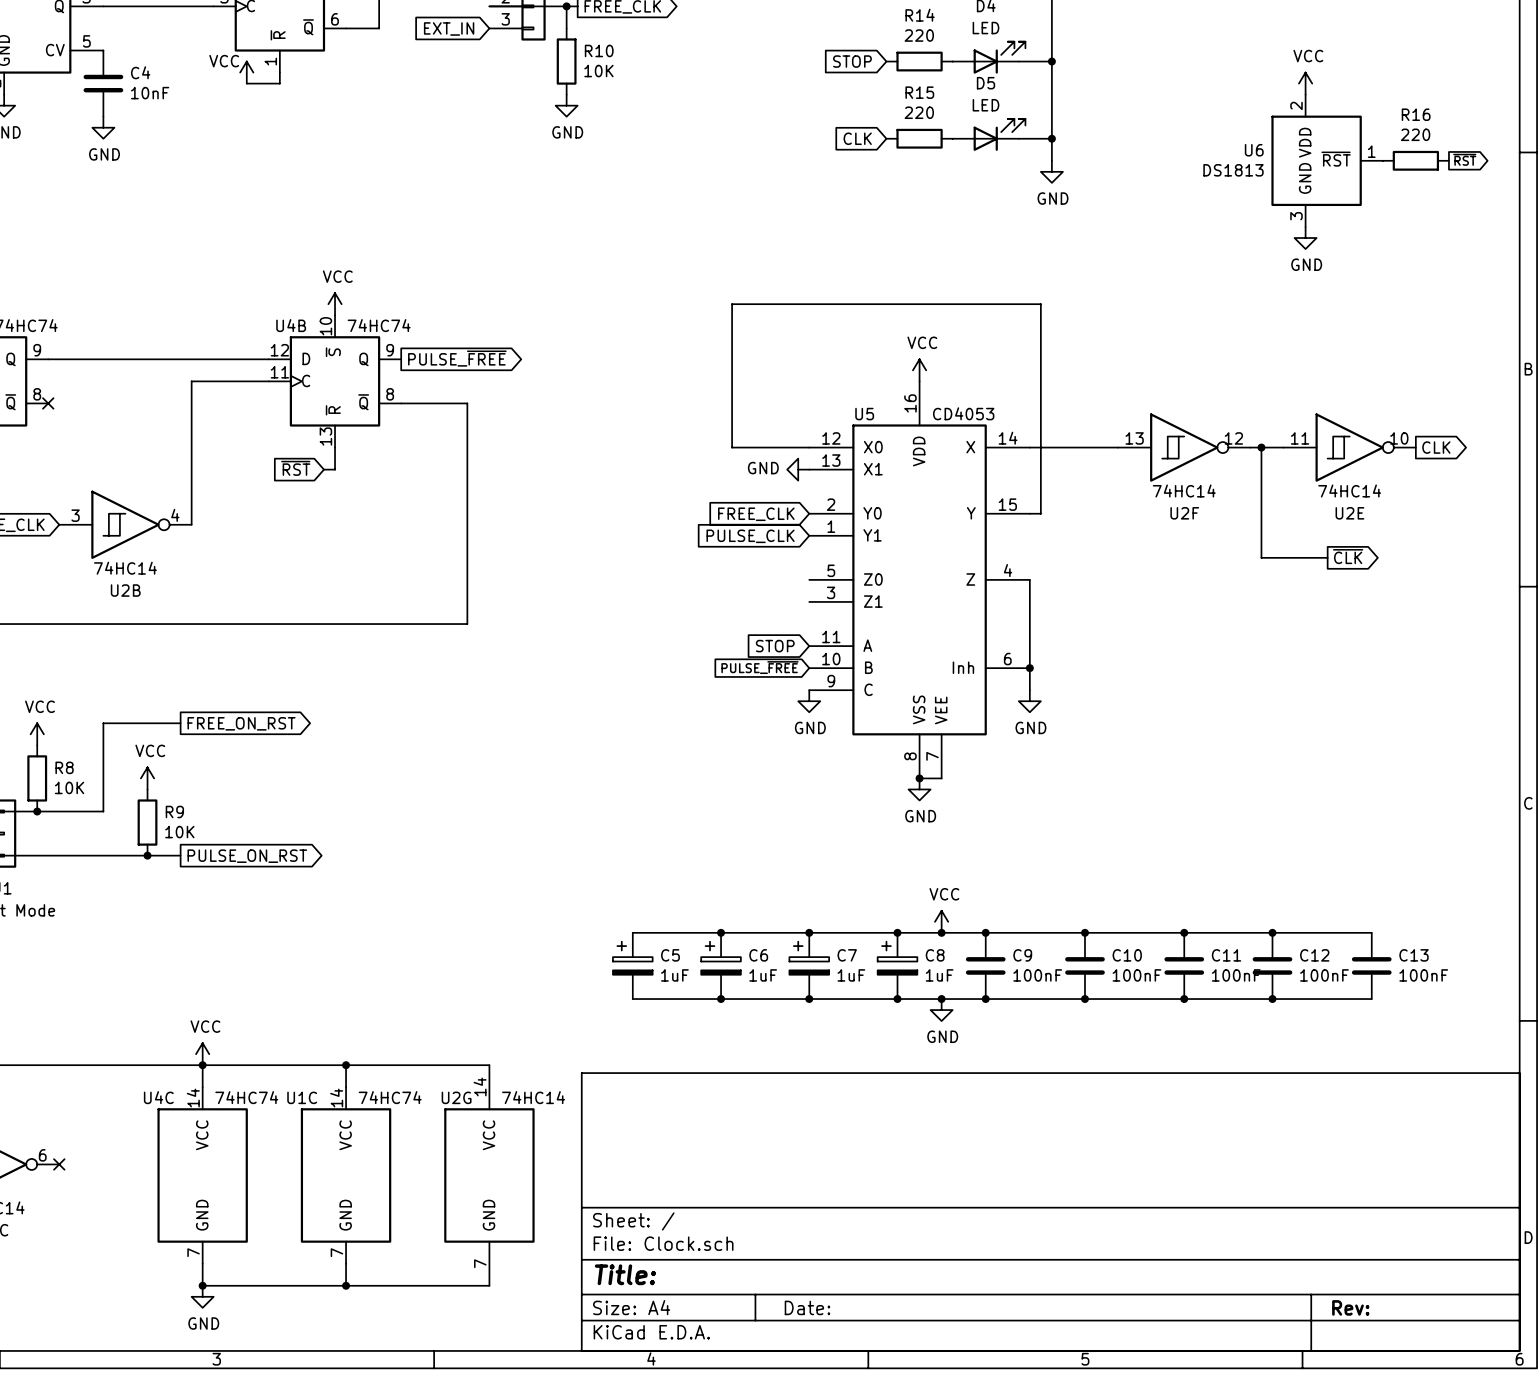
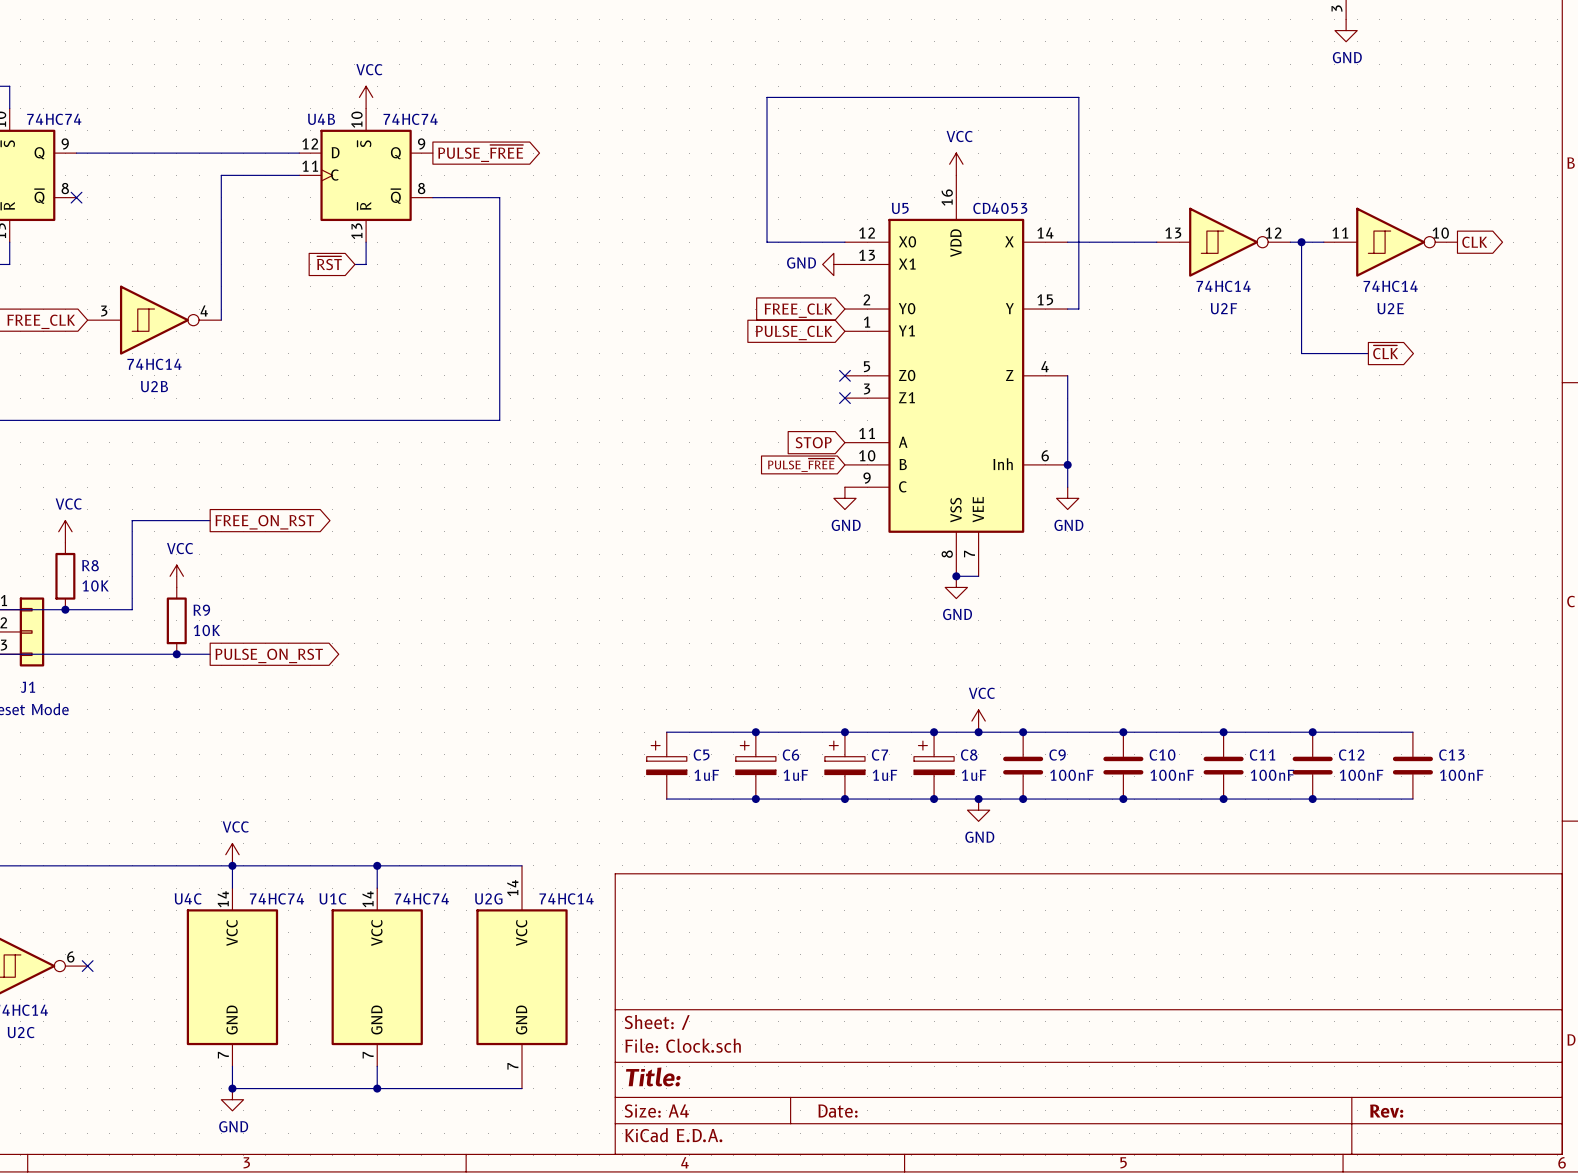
no-connect mark: none -> (844, 375)
no-connect mark: none -> (844, 398)

